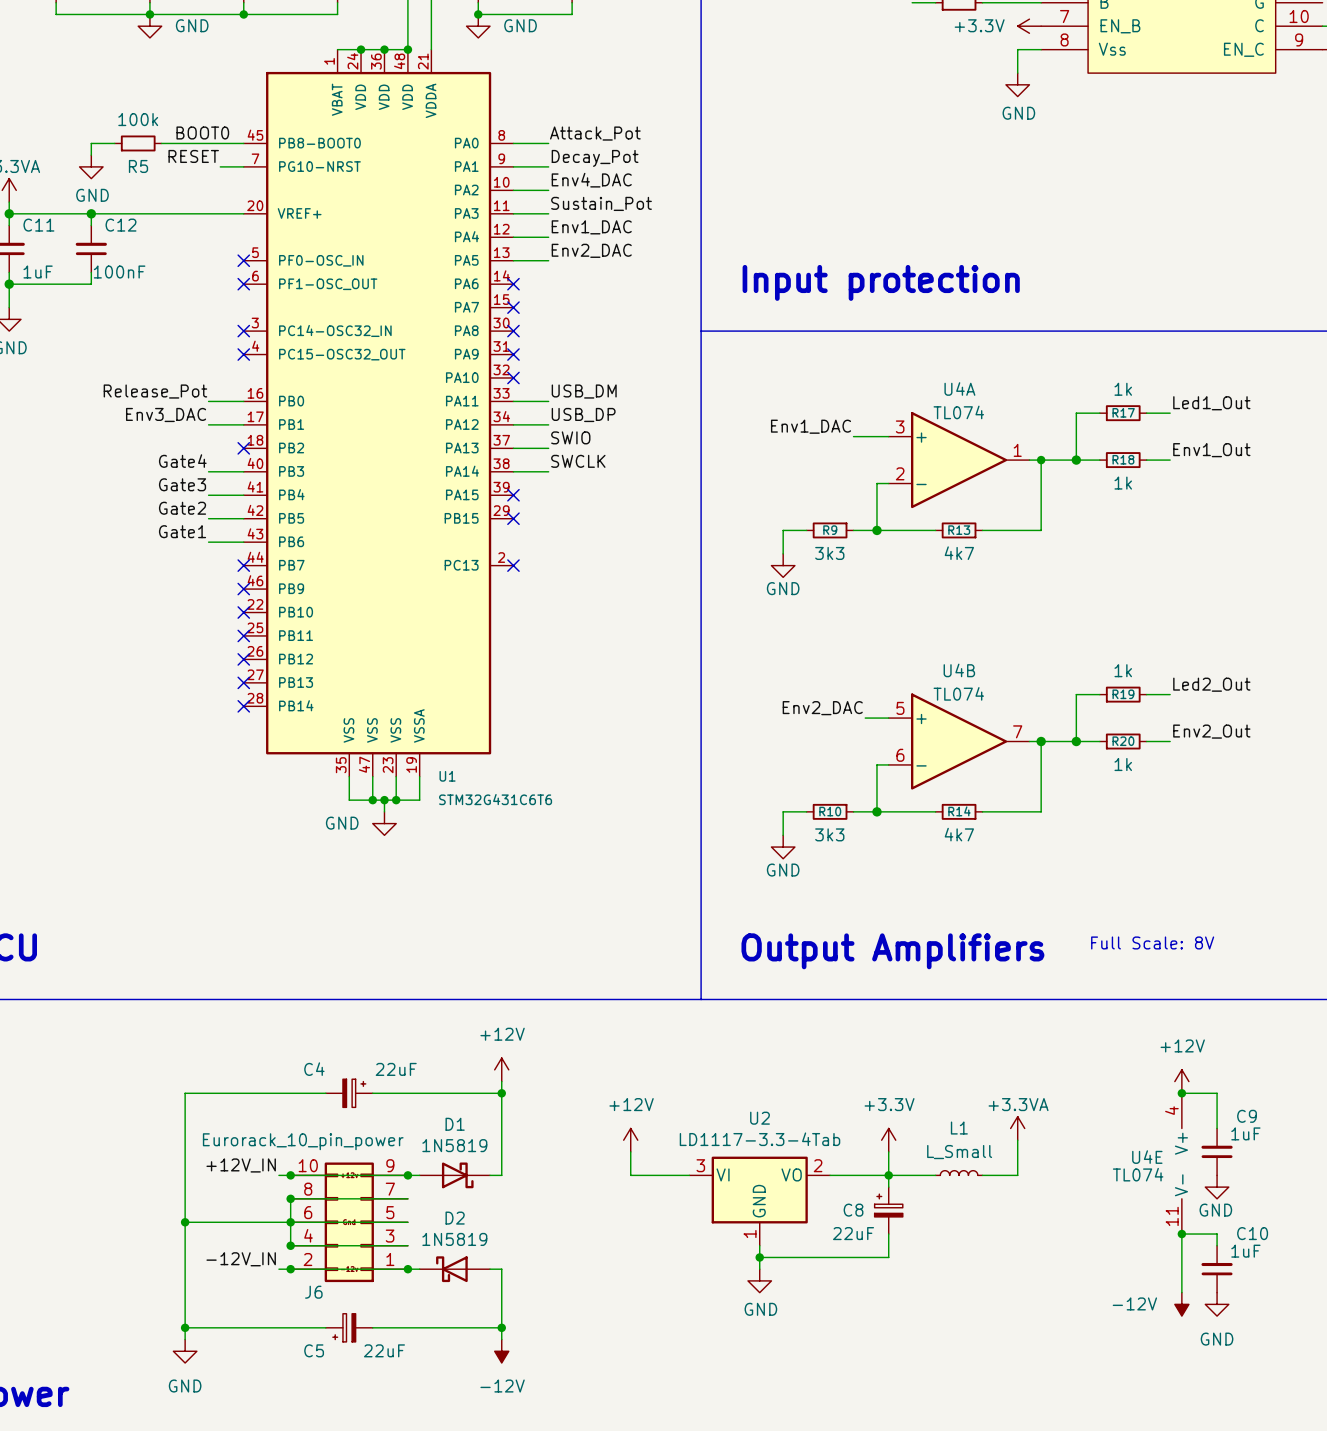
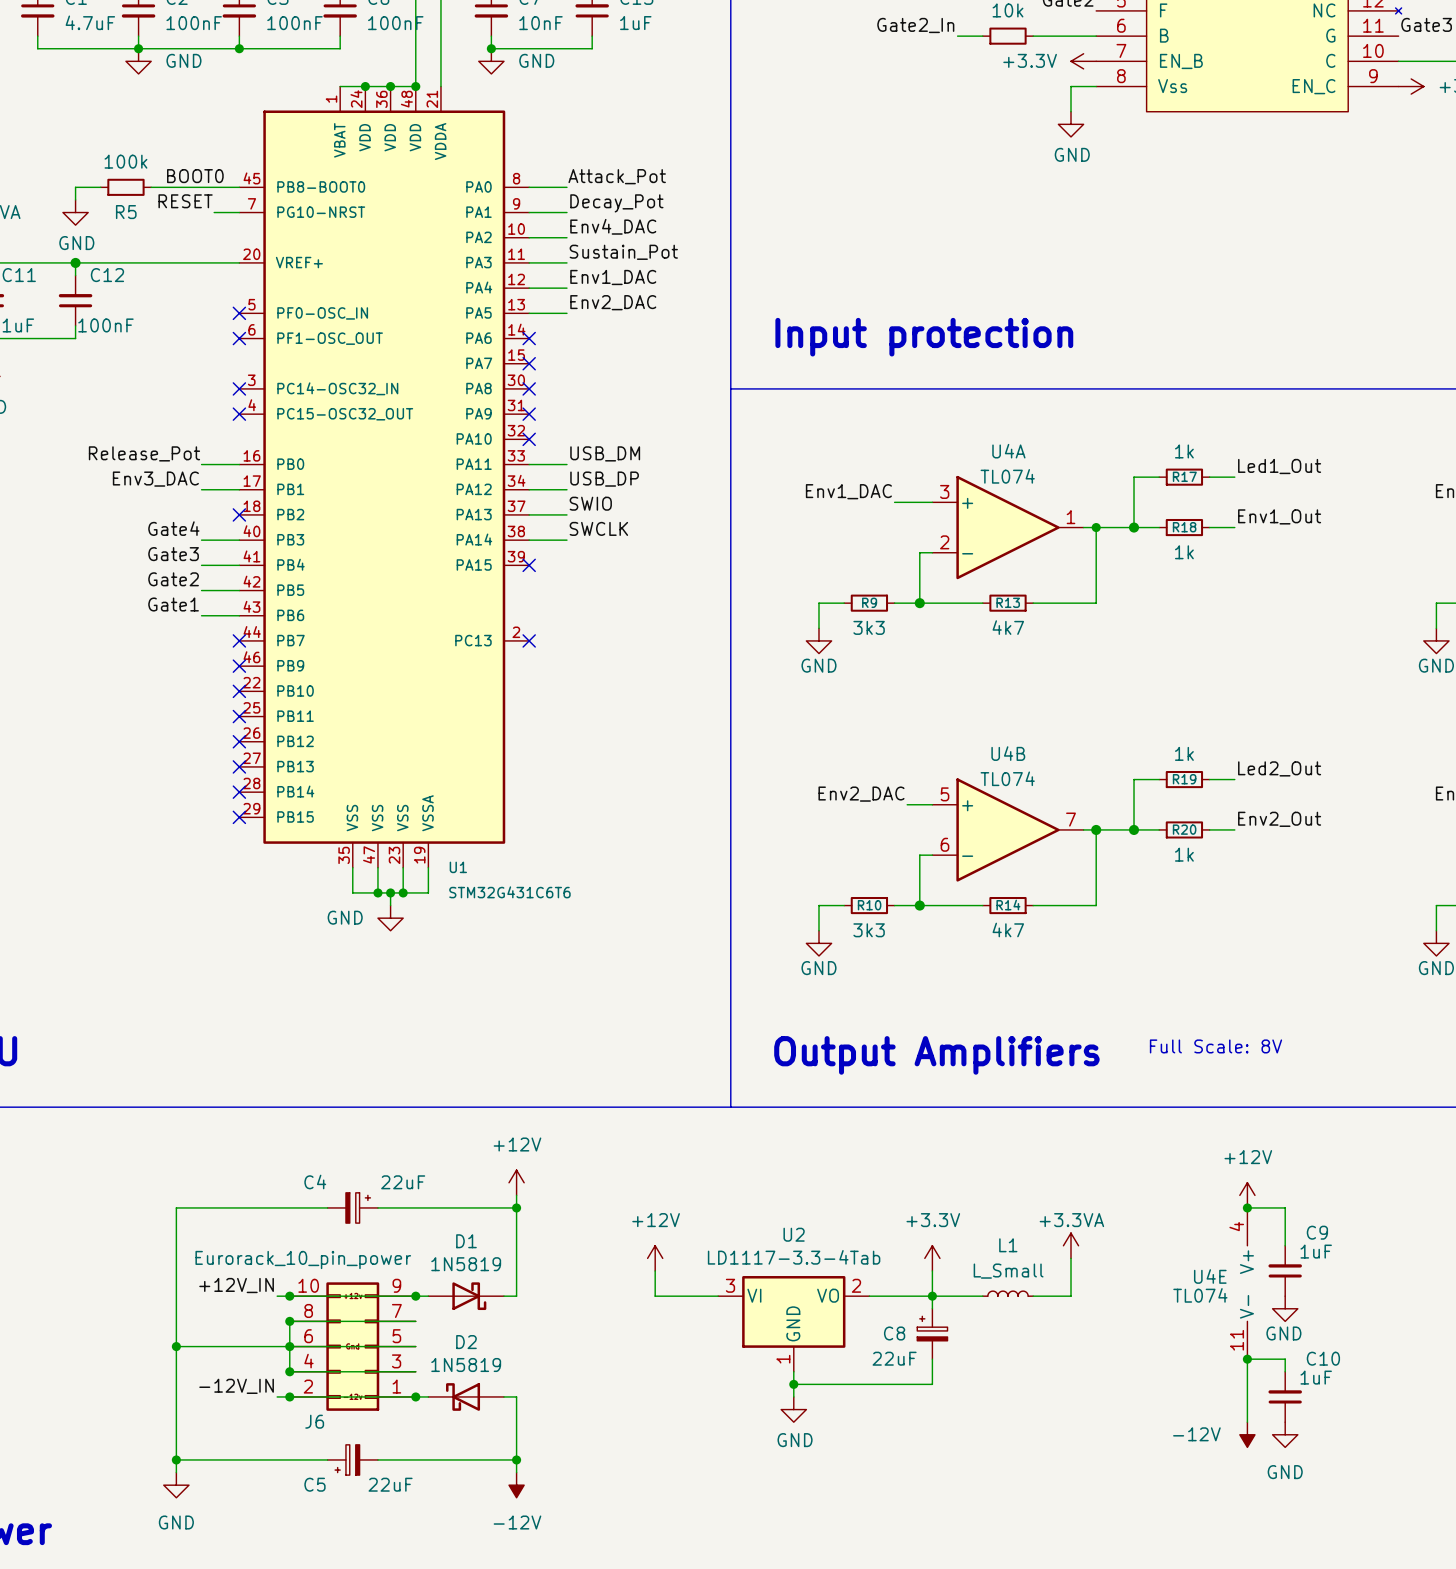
U1 symbol: [243, 49, 514, 777] -> [239, 86, 530, 868]
no-connect mark: (513, 518) -> none
no-connect mark: none -> (239, 817)

